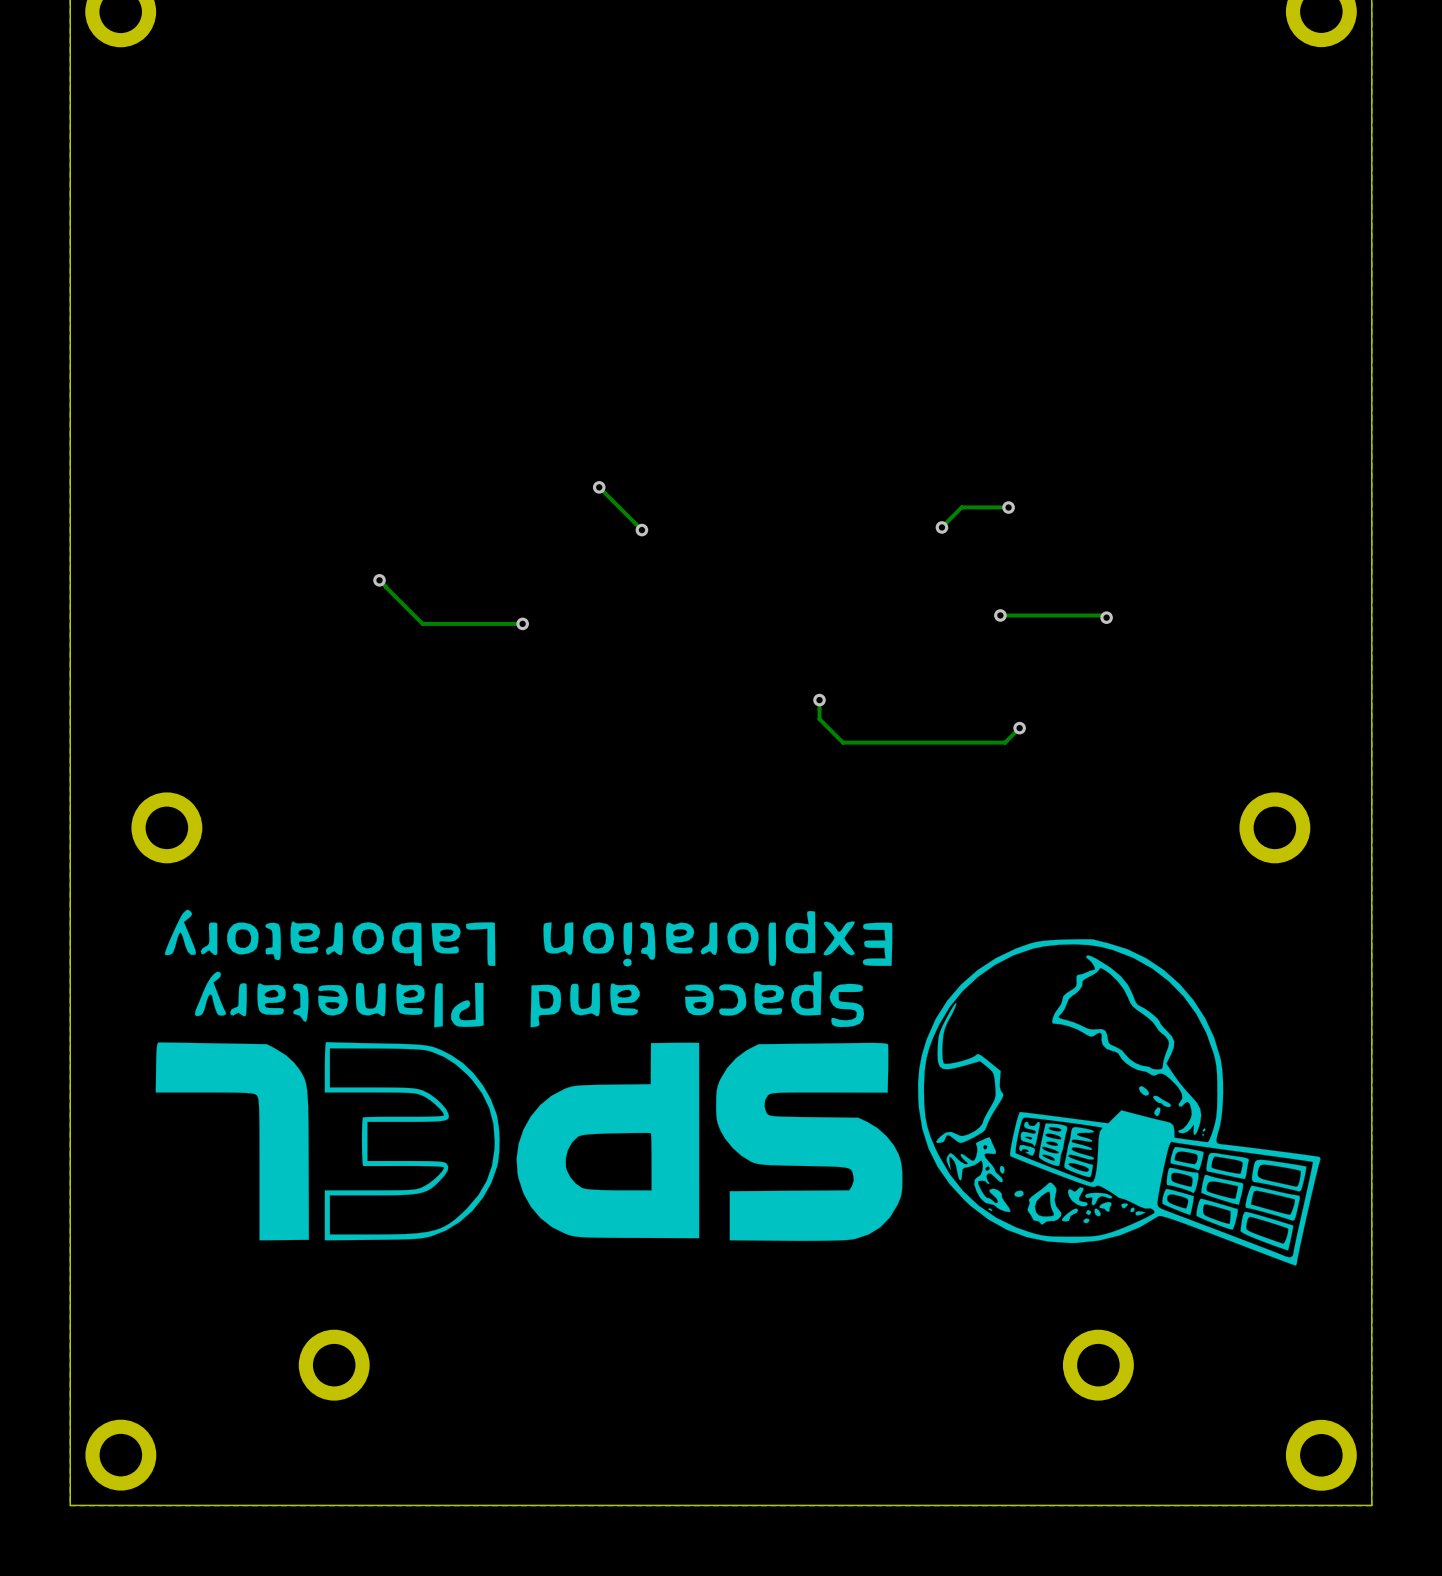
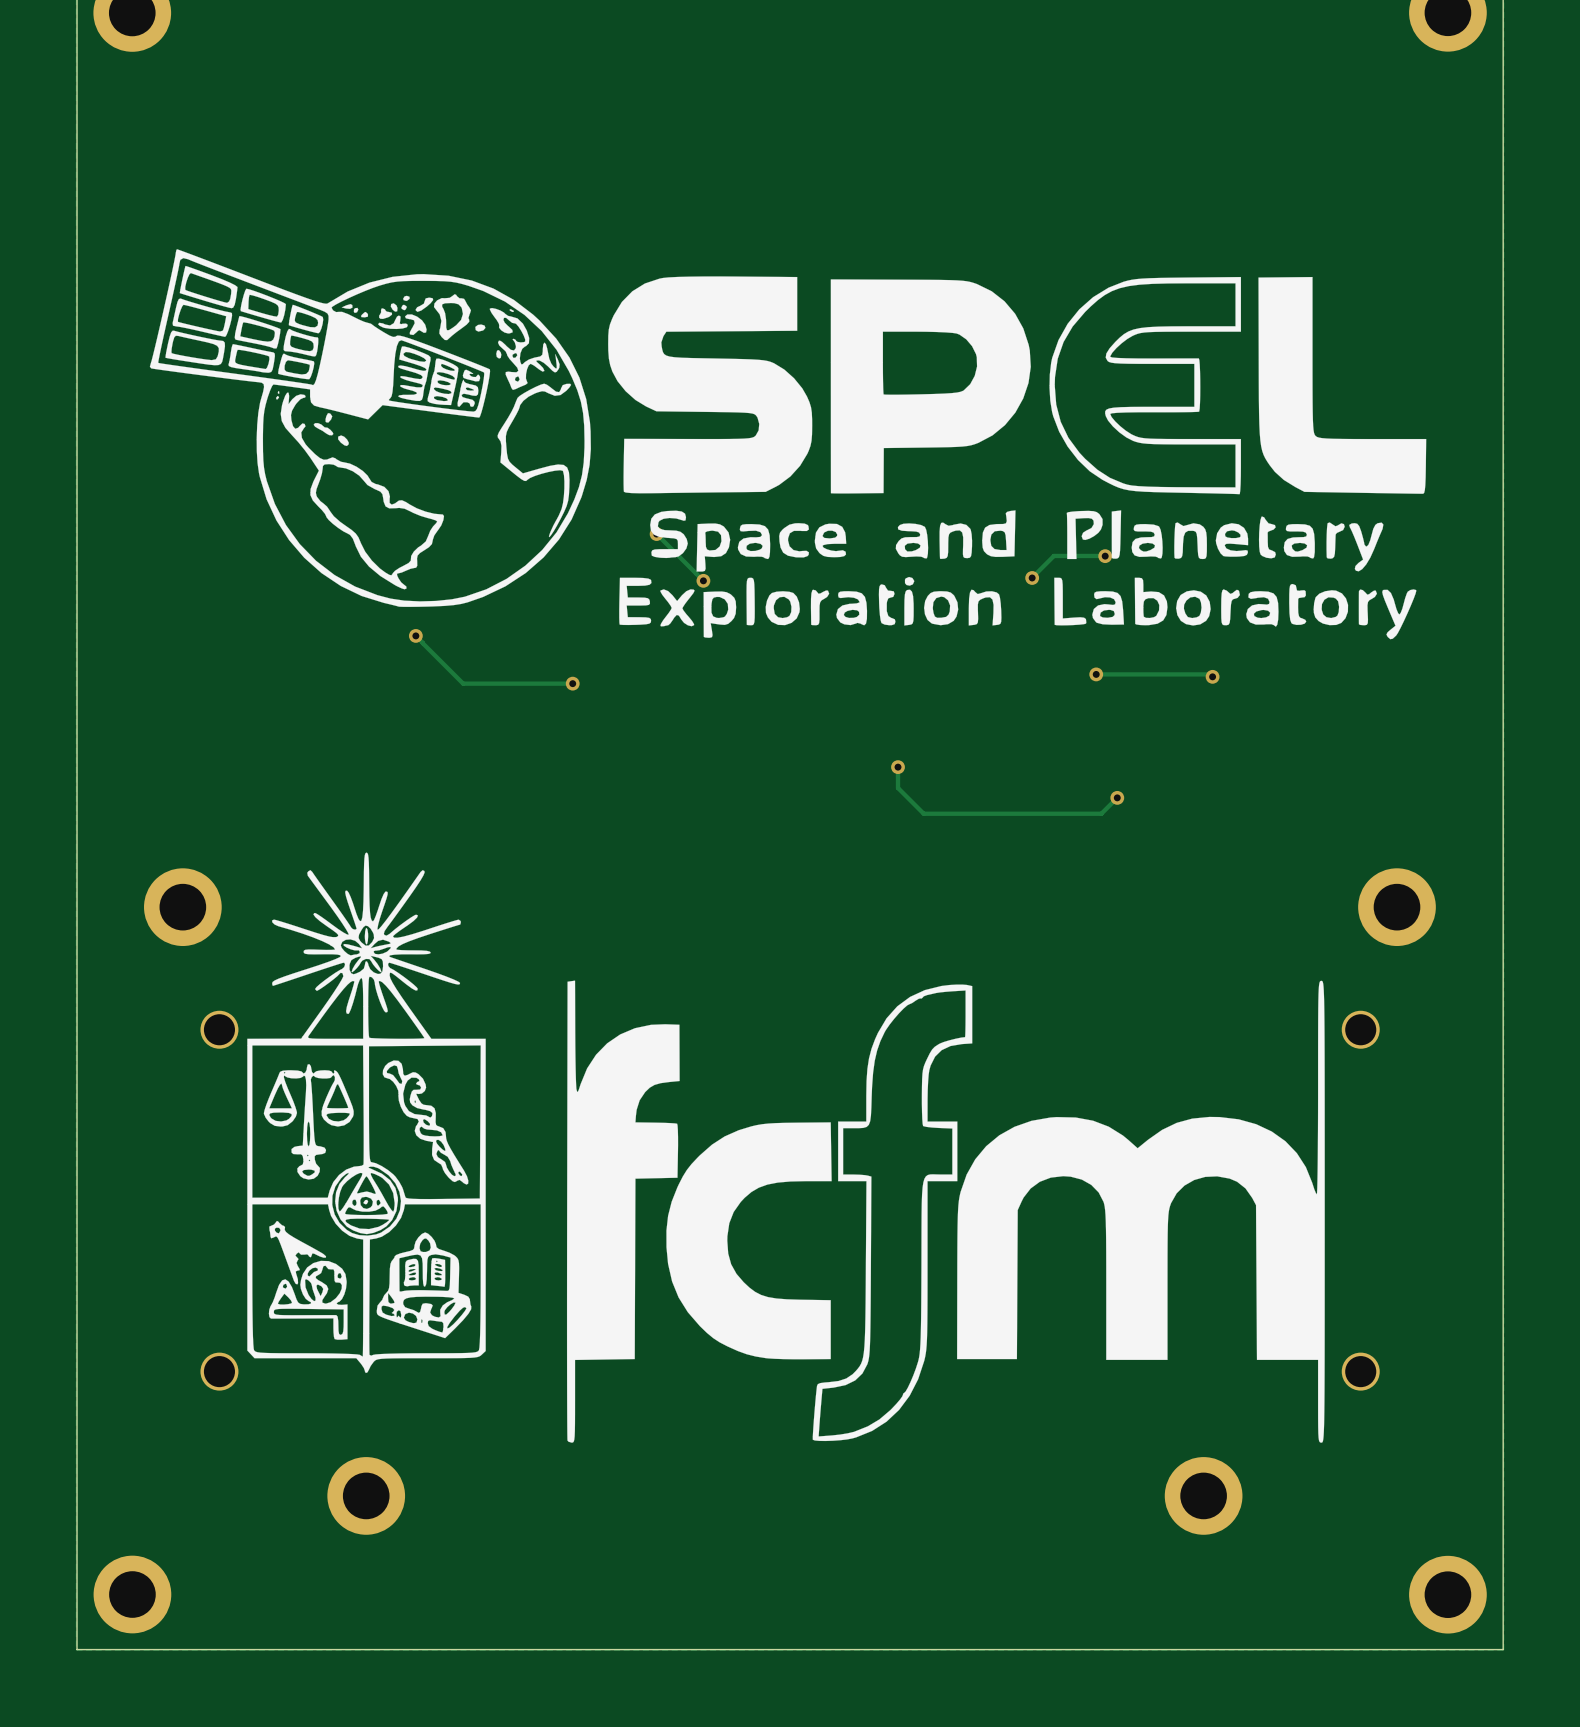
drawing: none -> [149, 249, 1427, 640]
drawing: none -> [247, 852, 1325, 1443]
drawing: [155, 909, 1321, 1266] -> none
part: none -> (219, 1029)
part: none -> (1360, 1029)
part: none -> (219, 1371)
part: none -> (1360, 1371)

